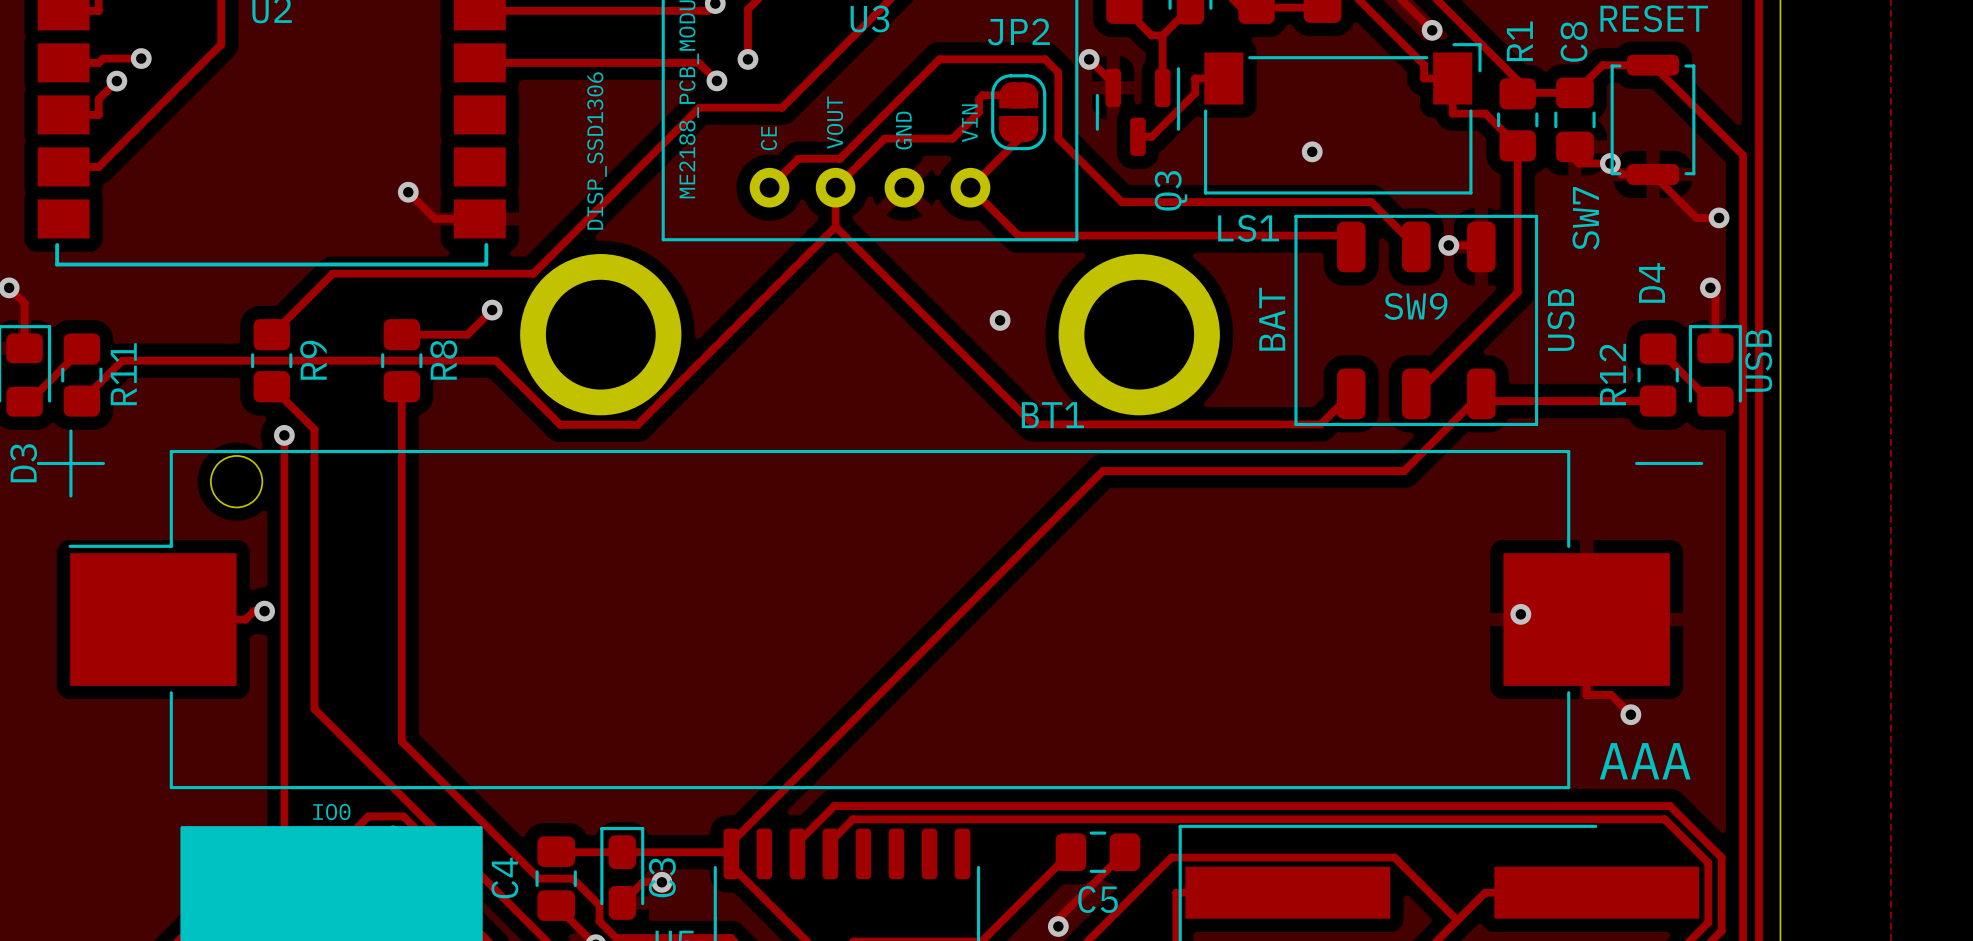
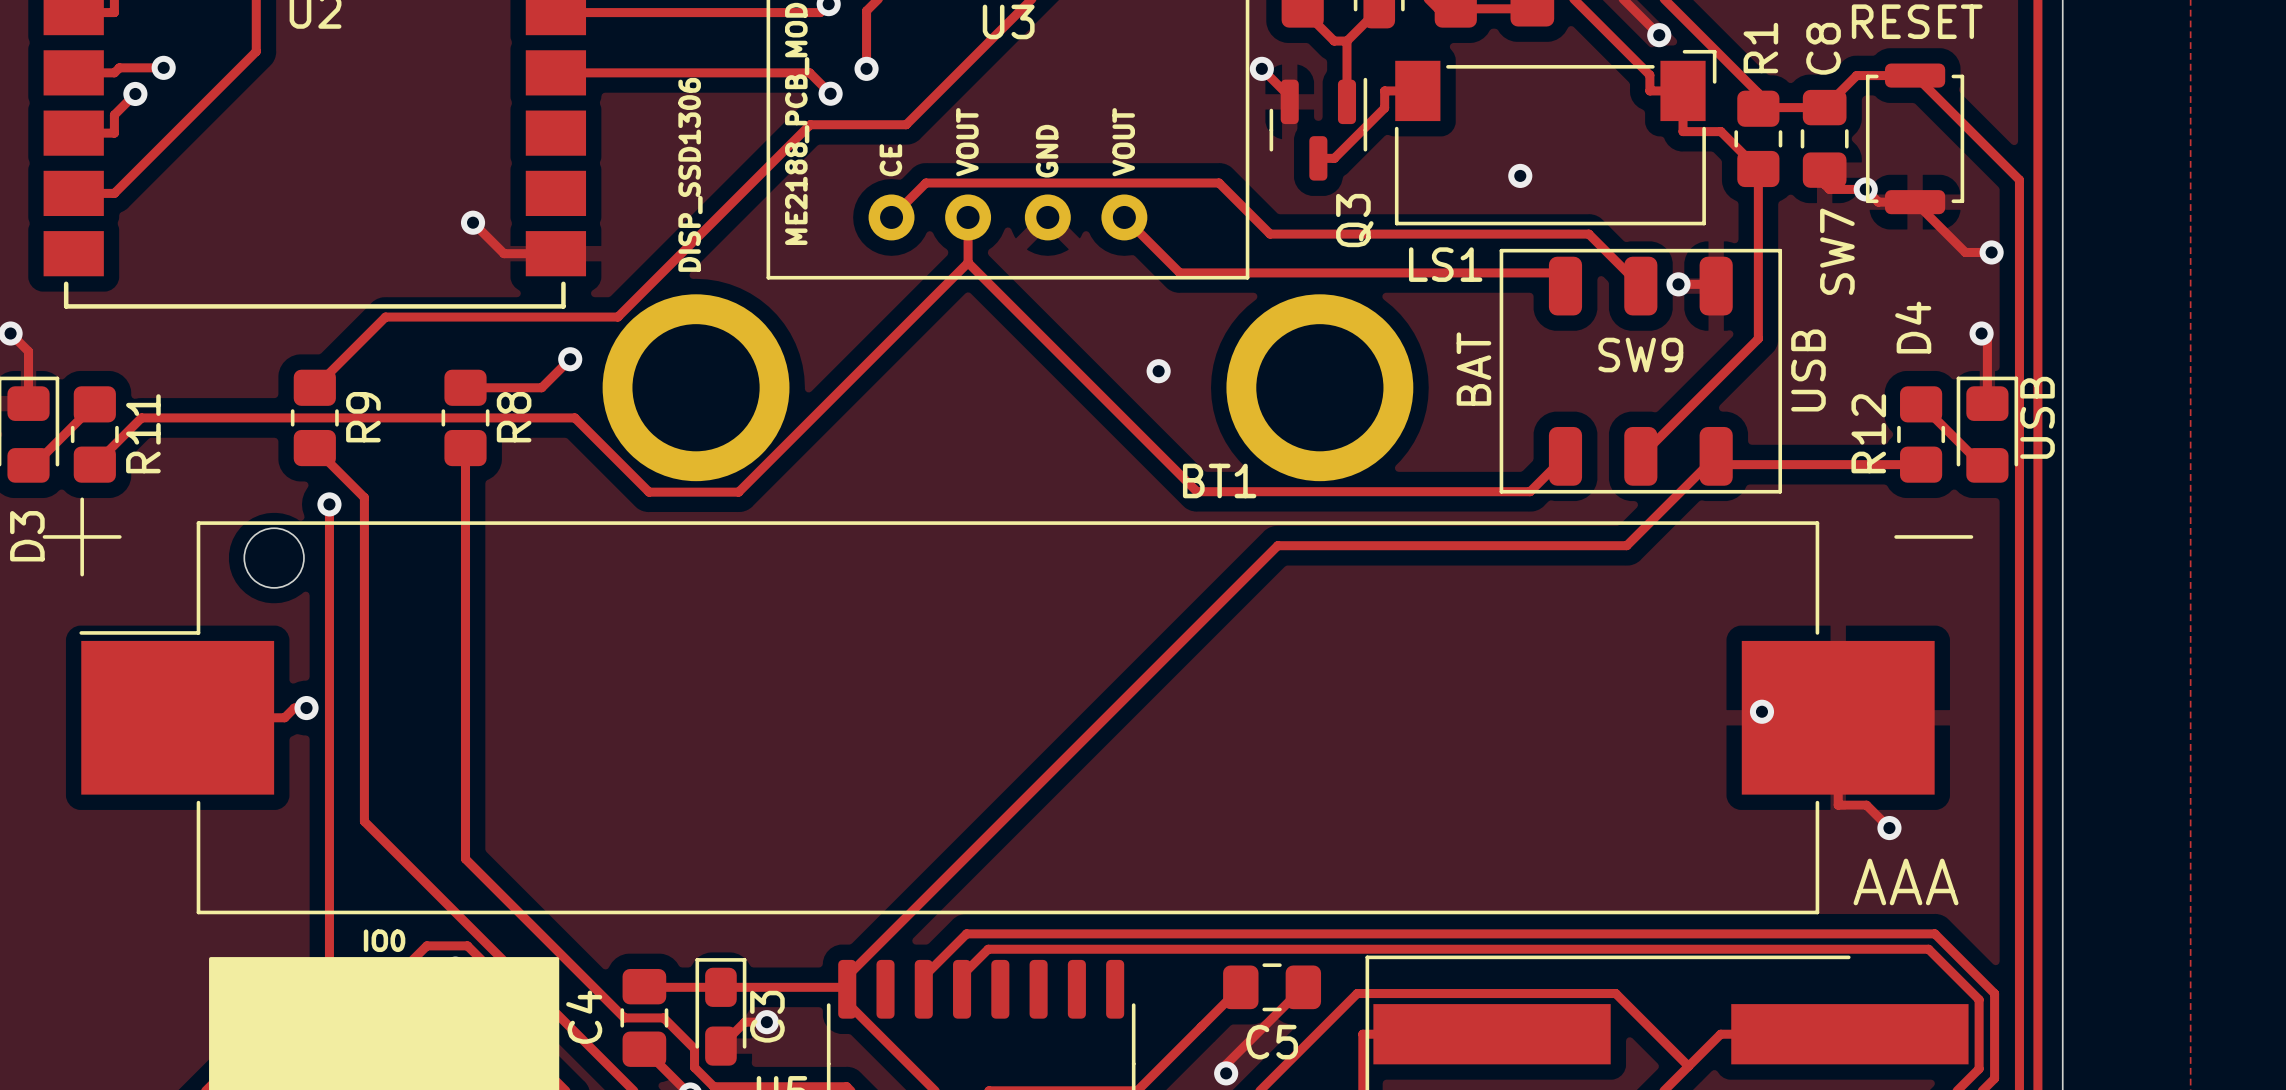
track: (1018, 95) (982, 95) (979, 98) (979, 112) (952, 138) (884, 138) (835, 187) -> none
JP2: (1018, 112) -> none
text: VIN (969, 123) -> VOUT (1123, 142)
track: (1018, 129) (1018, 139) (970, 187) -> none
track: (769, 187) (798, 158) (840, 158) (939, 59) (1045, 59) (1058, 72) (1058, 138) (1121, 202) -> (891, 217) (925, 183) (1219, 183) (1270, 234) (1299, 234)

